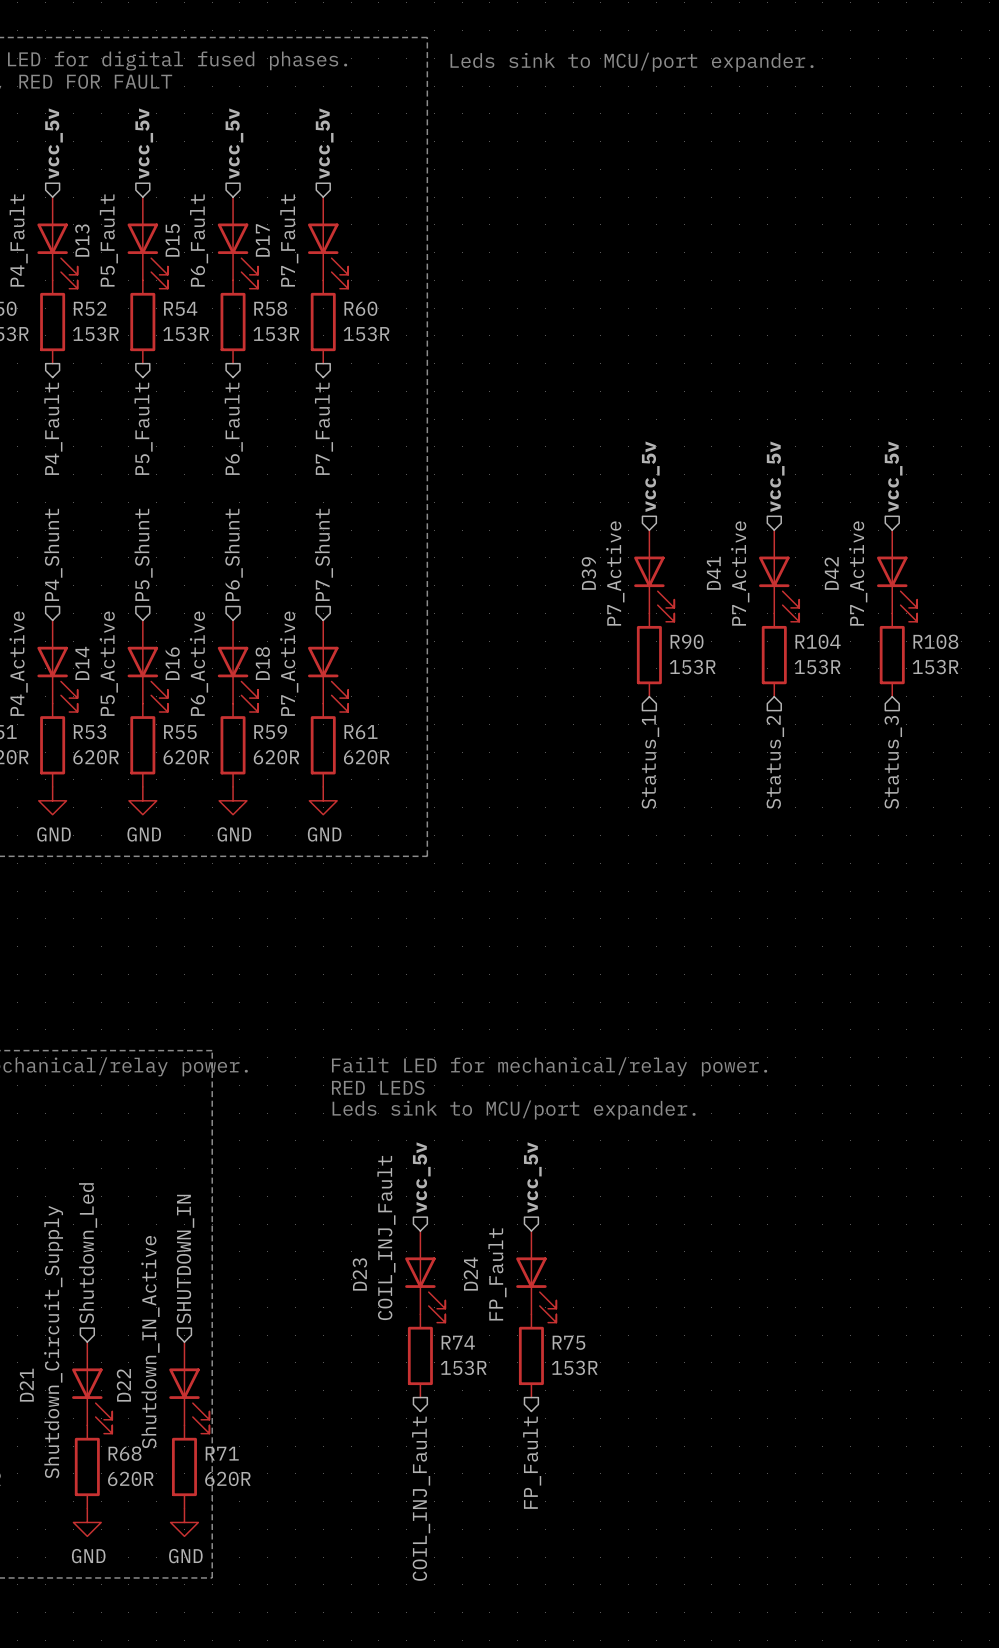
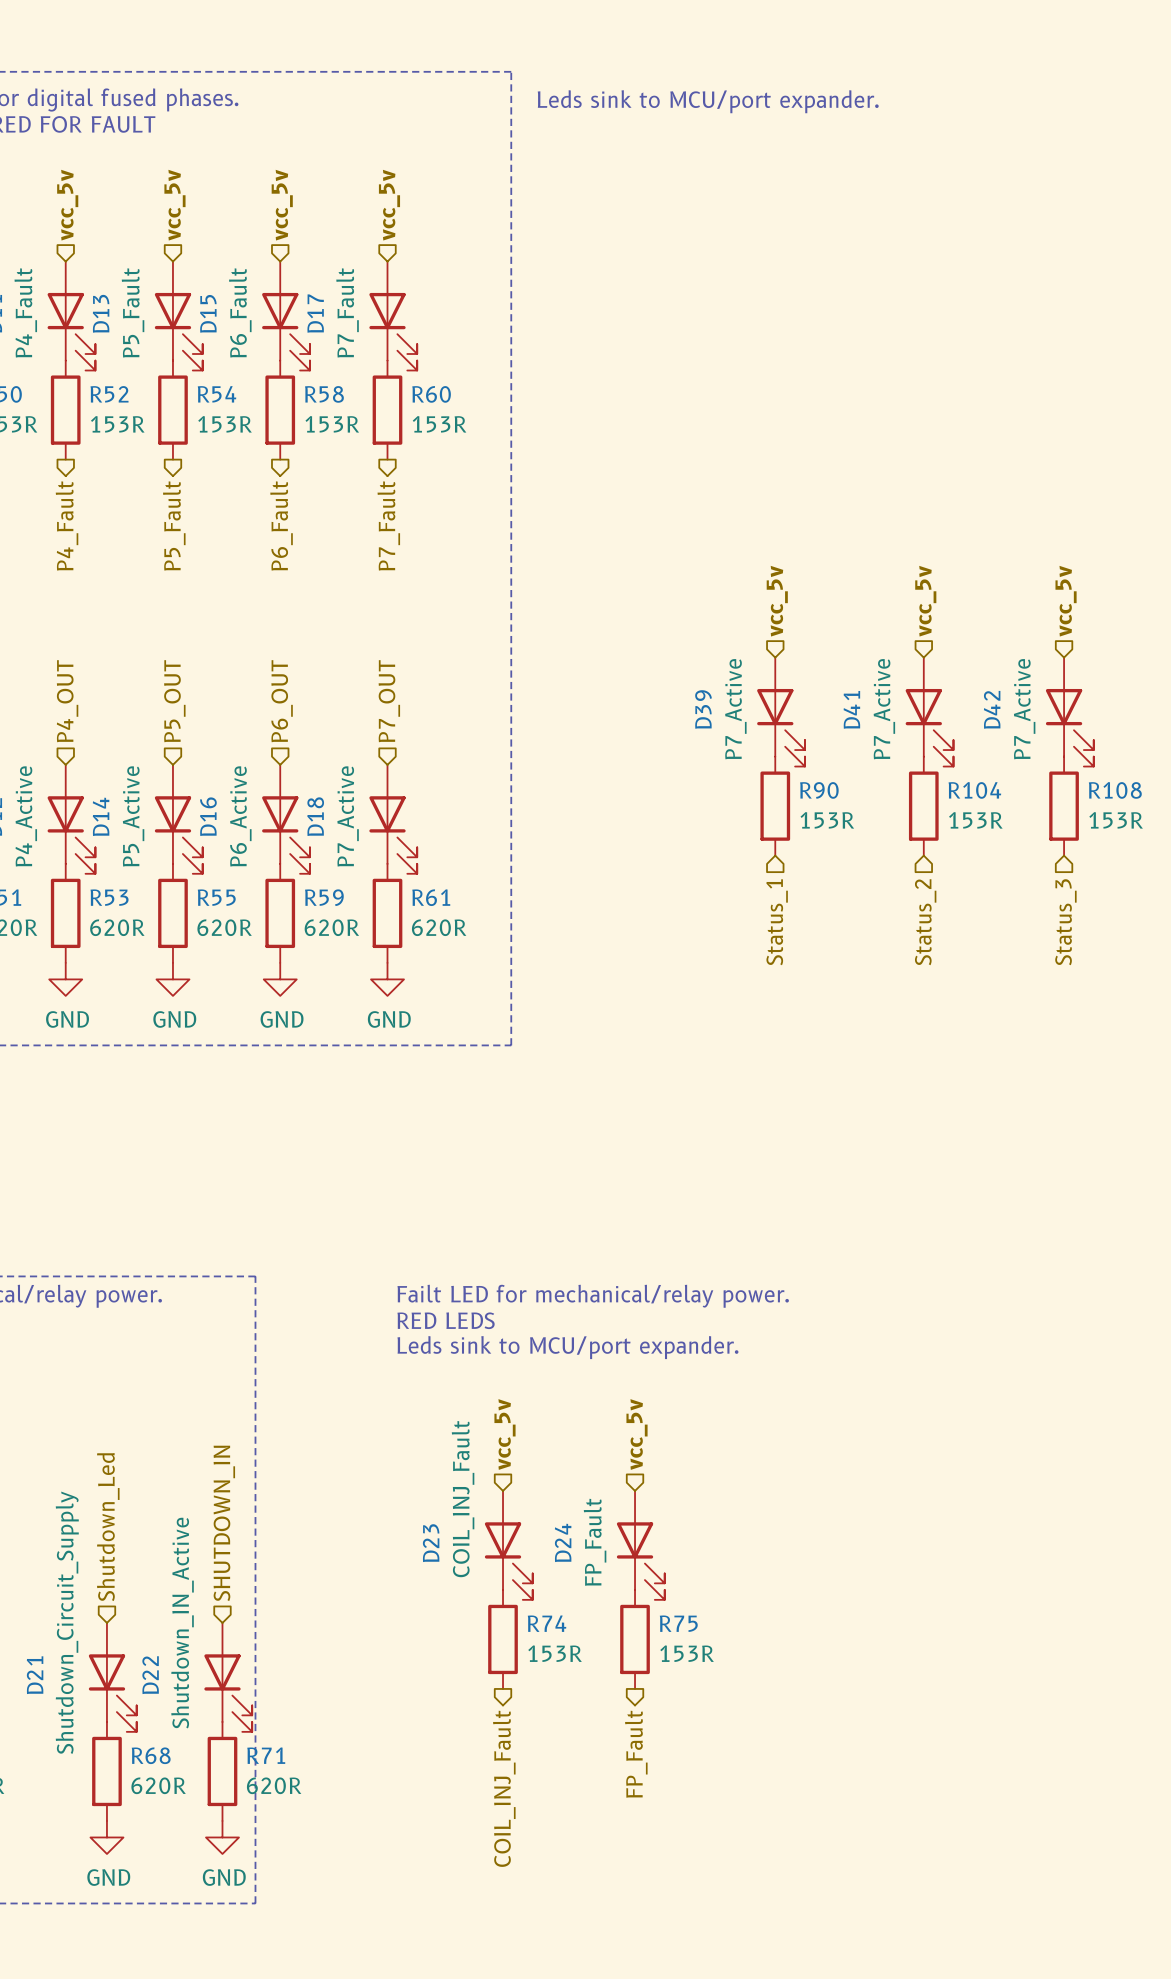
hierarchical label: P4_Shunt (53, 554) -> P4_OUT (67, 701)
hierarchical label: P5_Shunt (143, 554) -> P5_OUT (174, 701)
hierarchical label: P6_Shunt (233, 554) -> P6_OUT (282, 701)
hierarchical label: P7_Shunt (323, 554) -> P7_OUT (389, 701)

